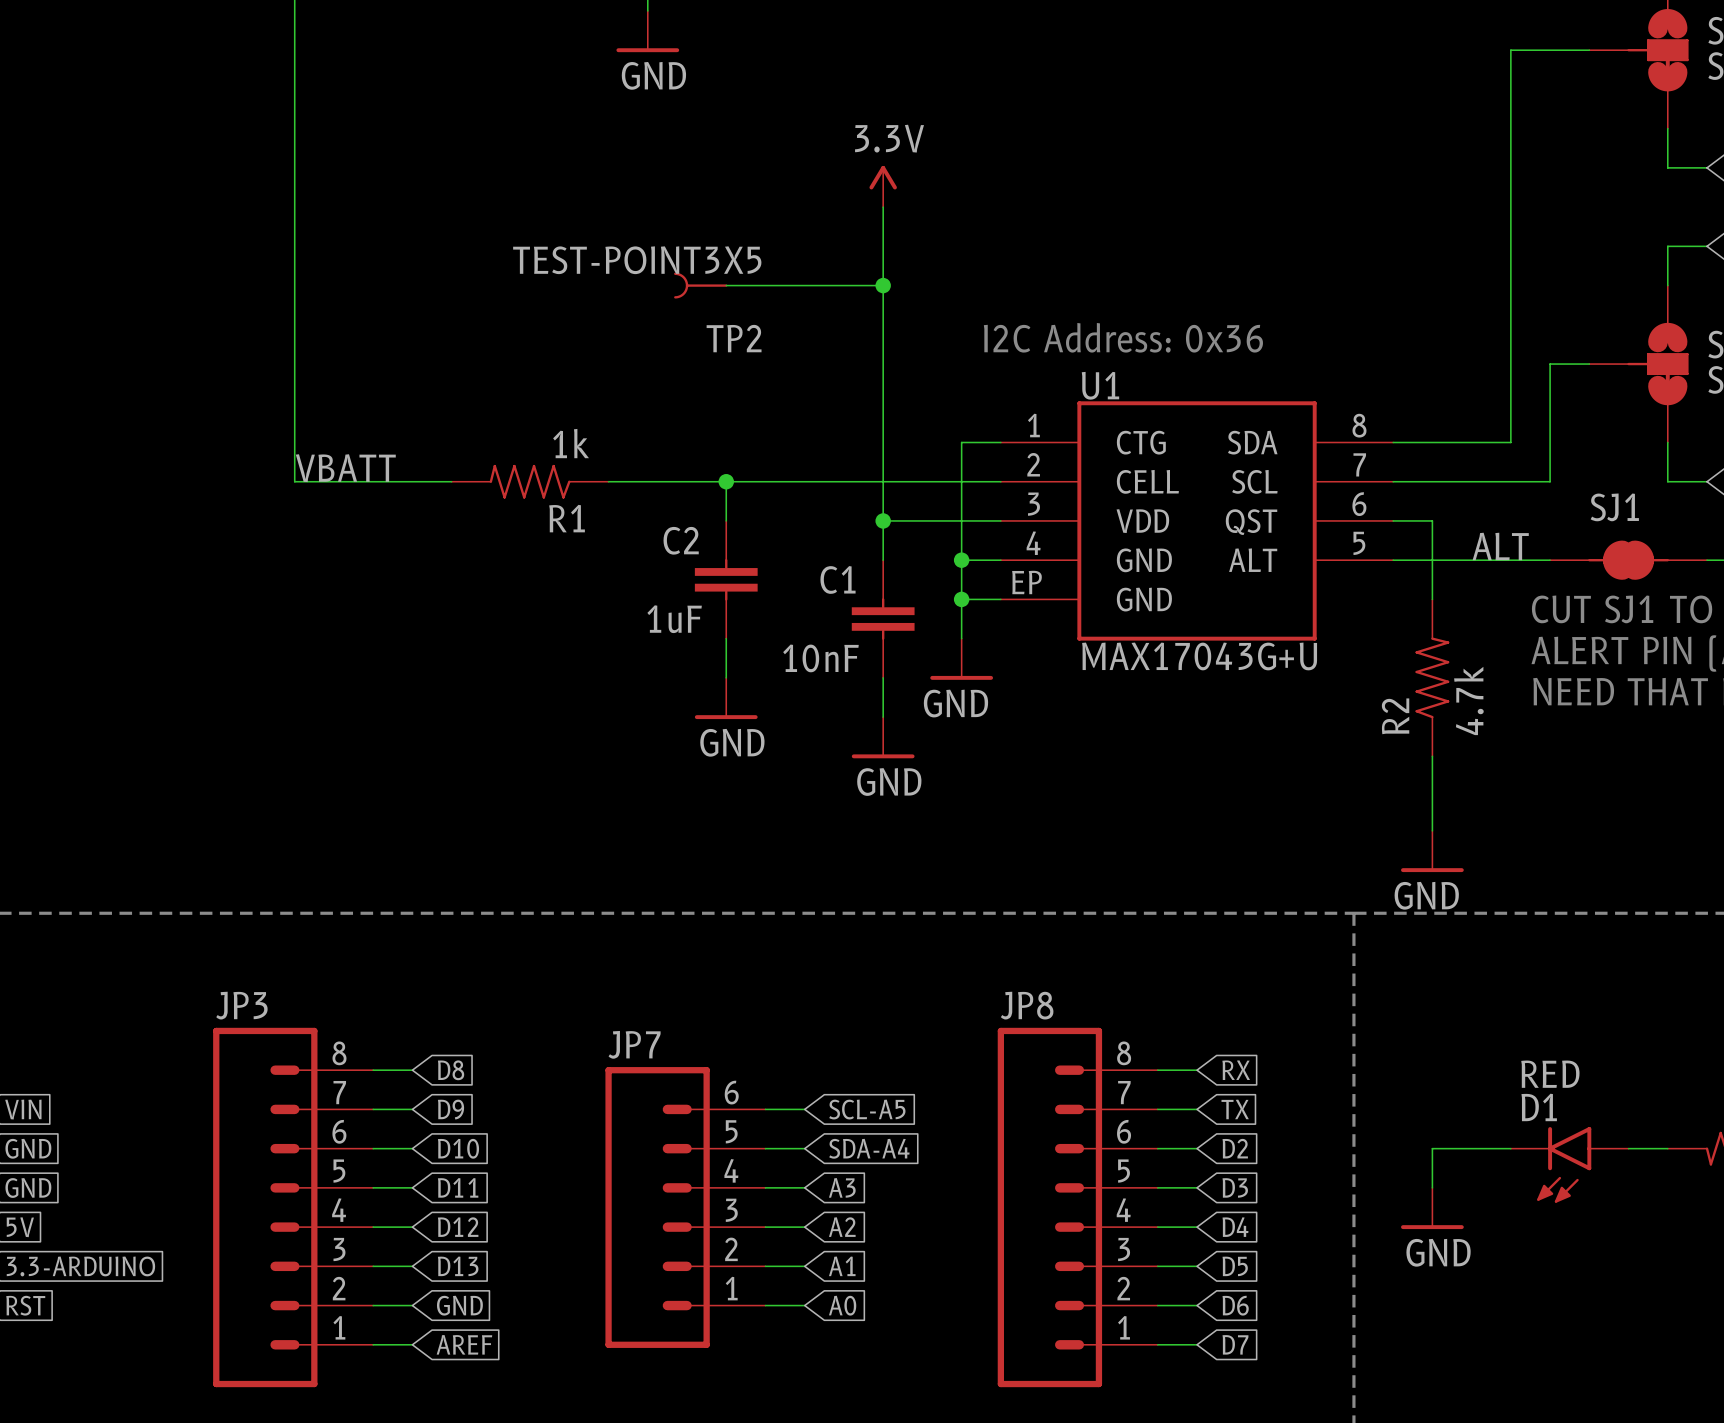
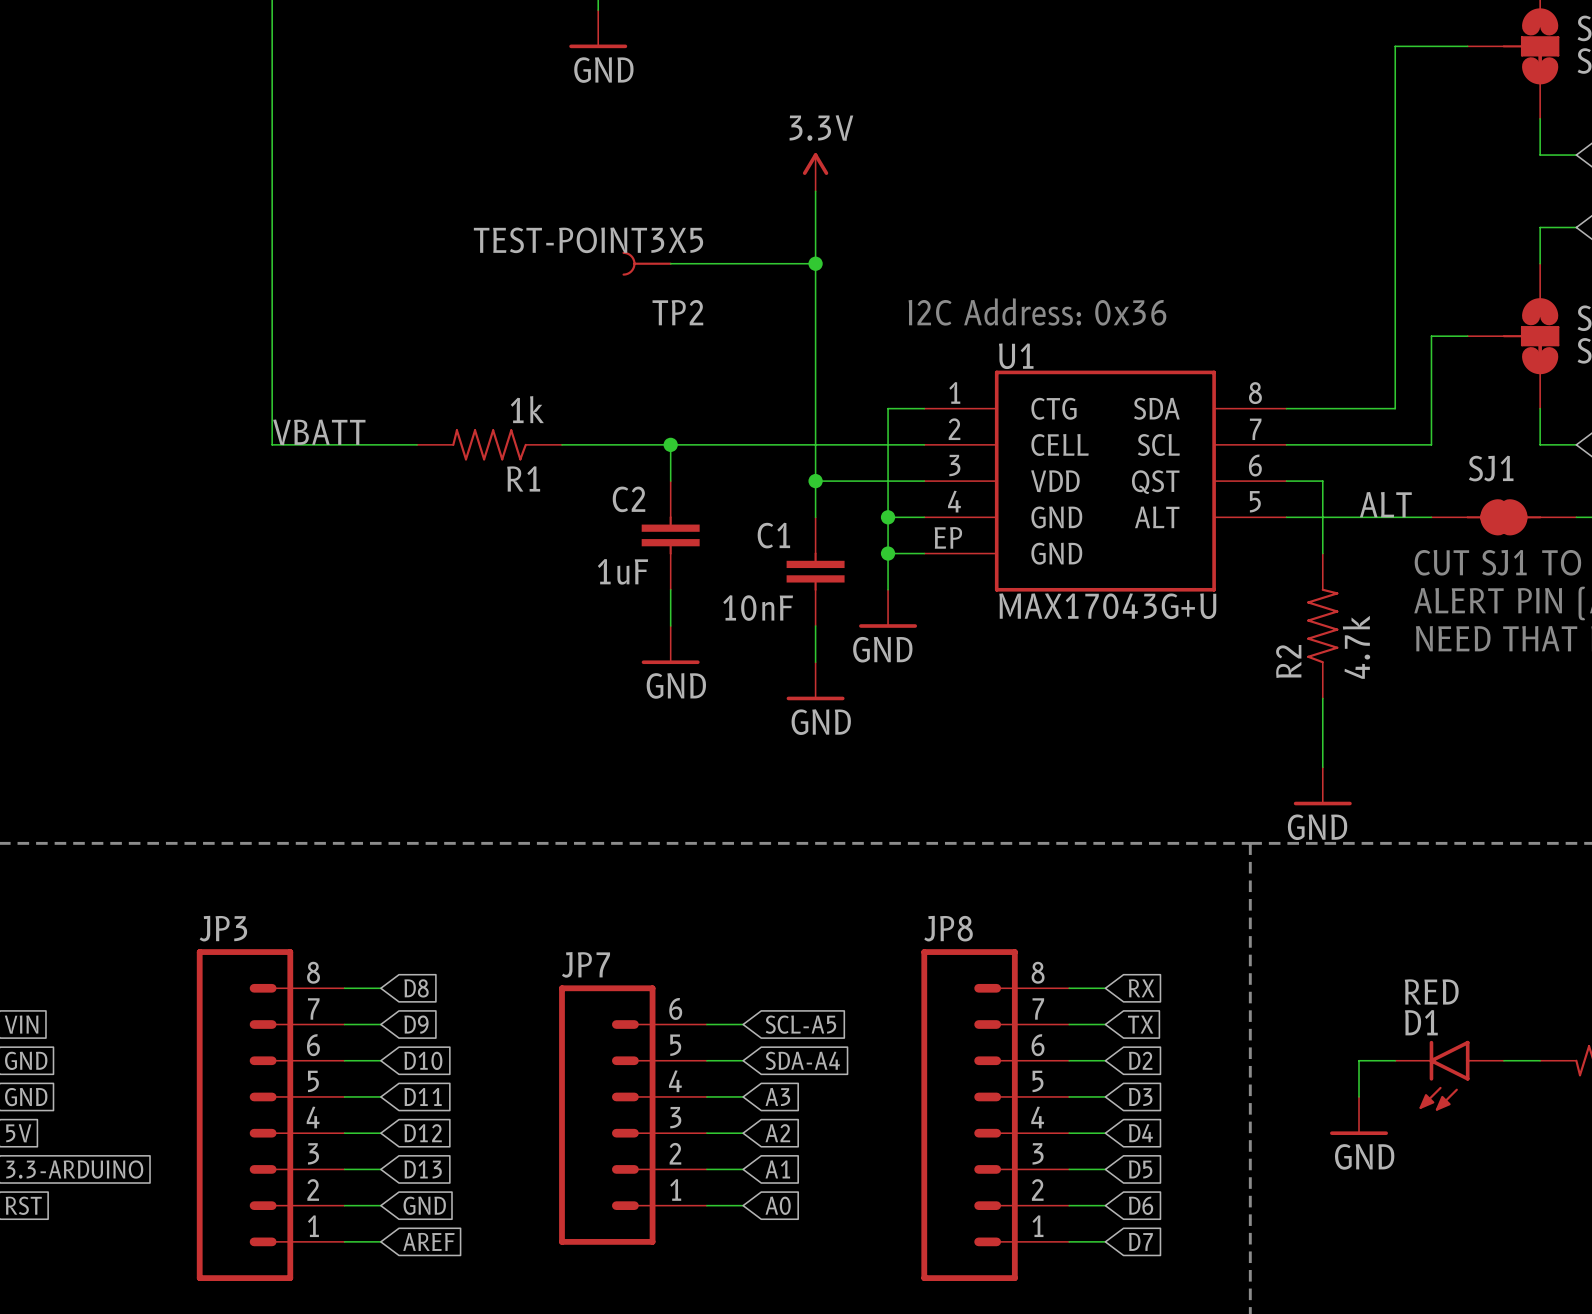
wire: (1471, 1148) (1432, 1148) (1432, 1187) -> (1359, 1060) (1359, 1096)
power symbol position: GND (1432, 1208) -> GND (1359, 1115)

